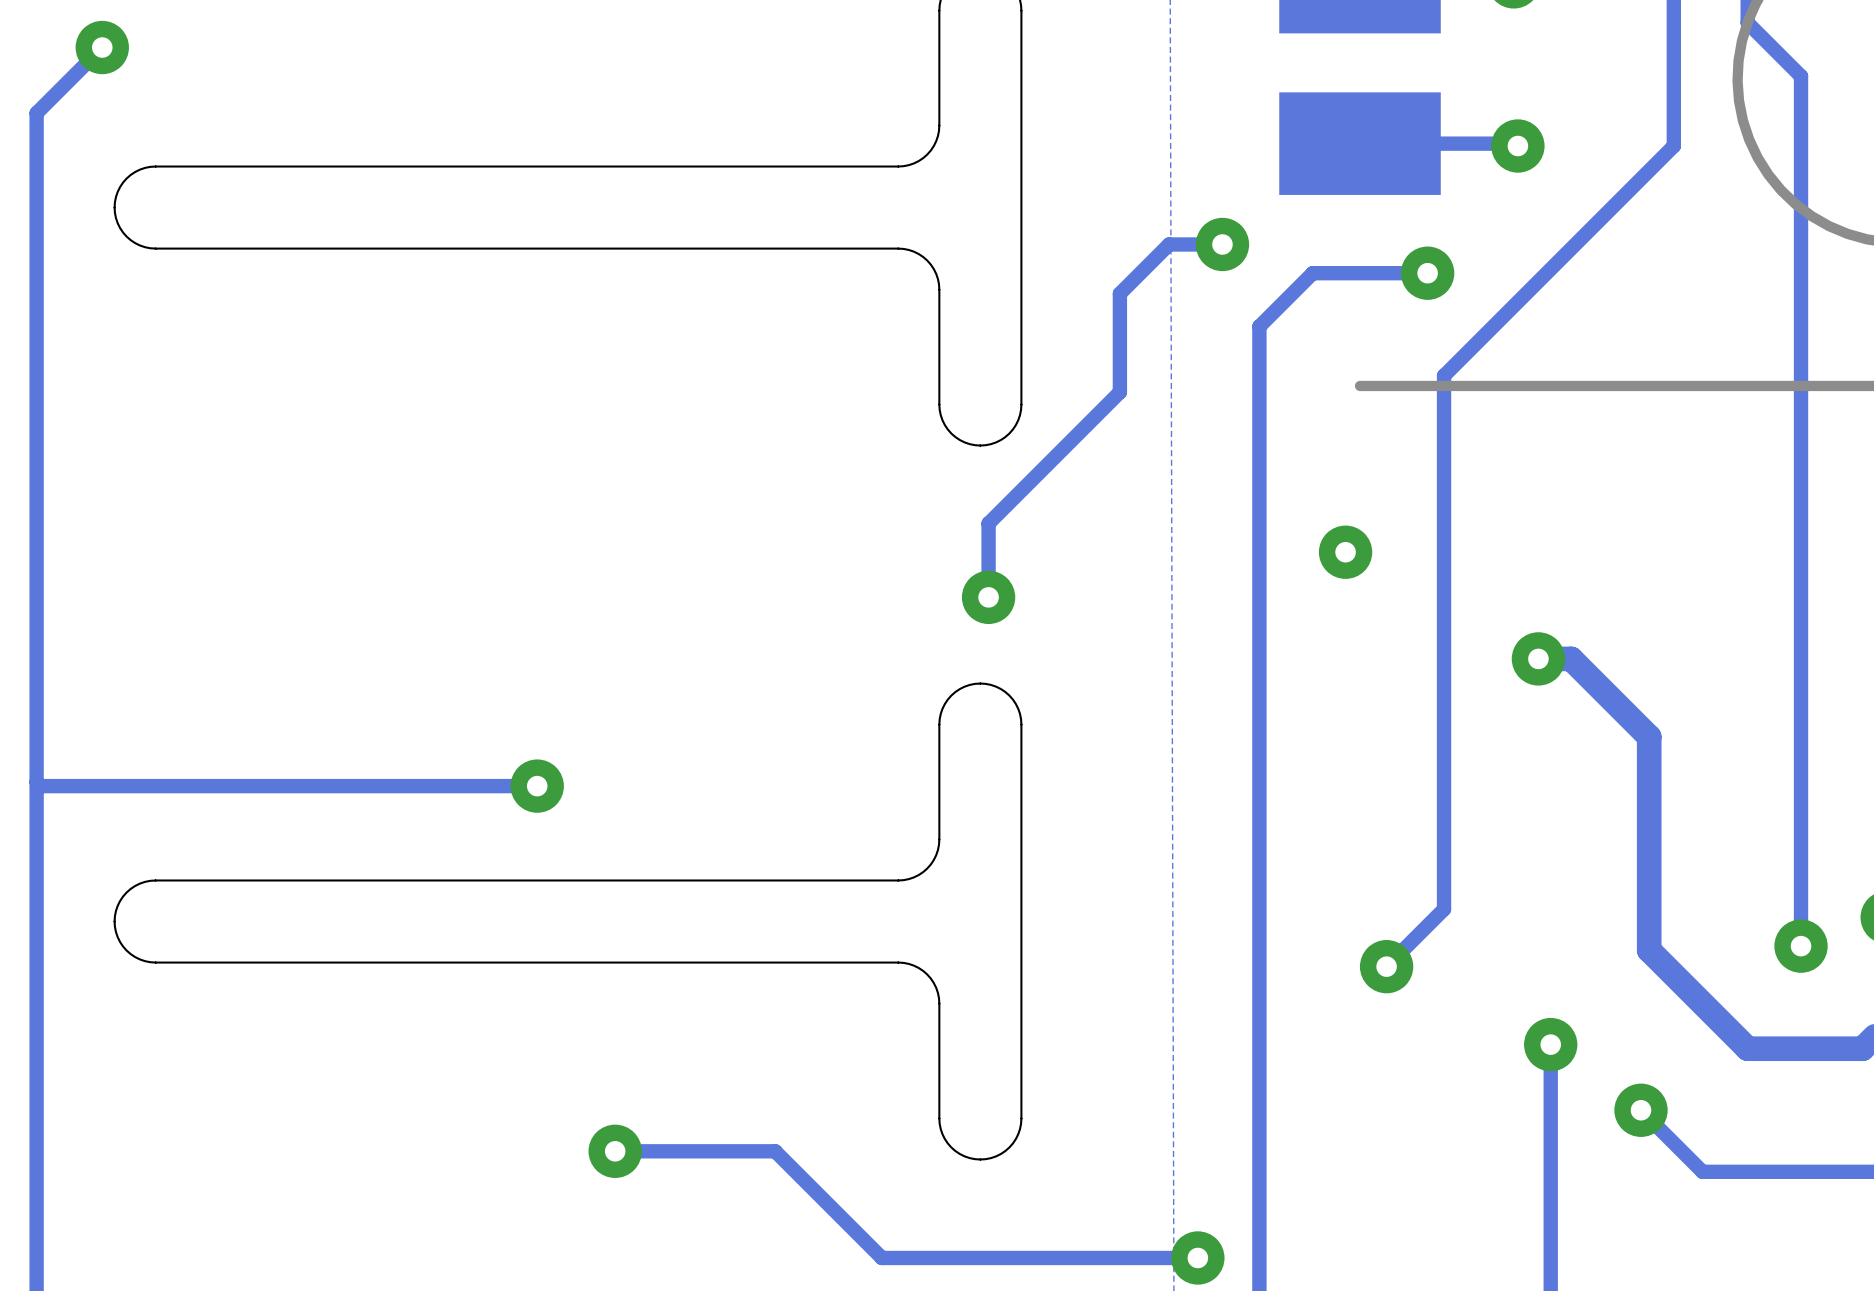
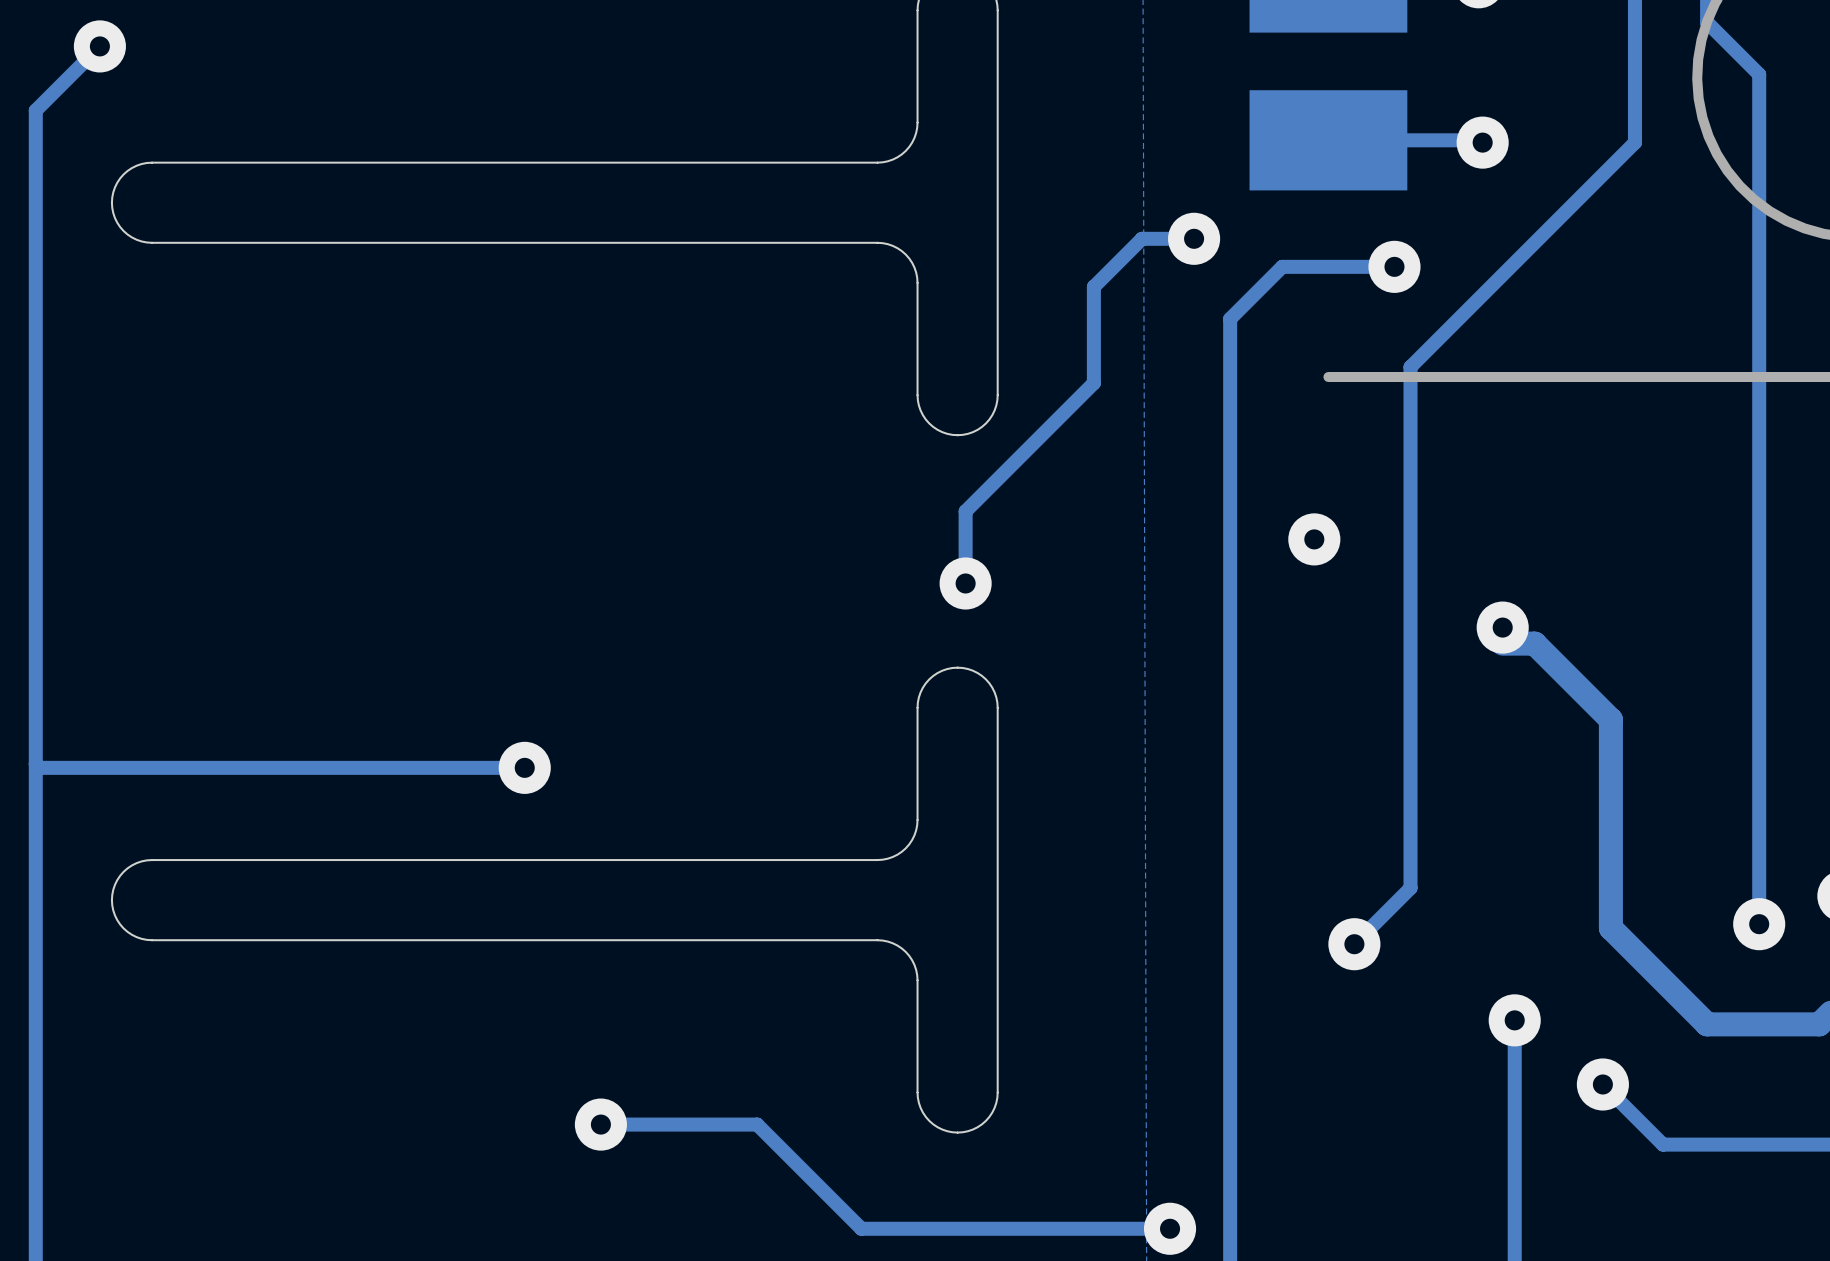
via position: (1538, 658) -> (1502, 627)

